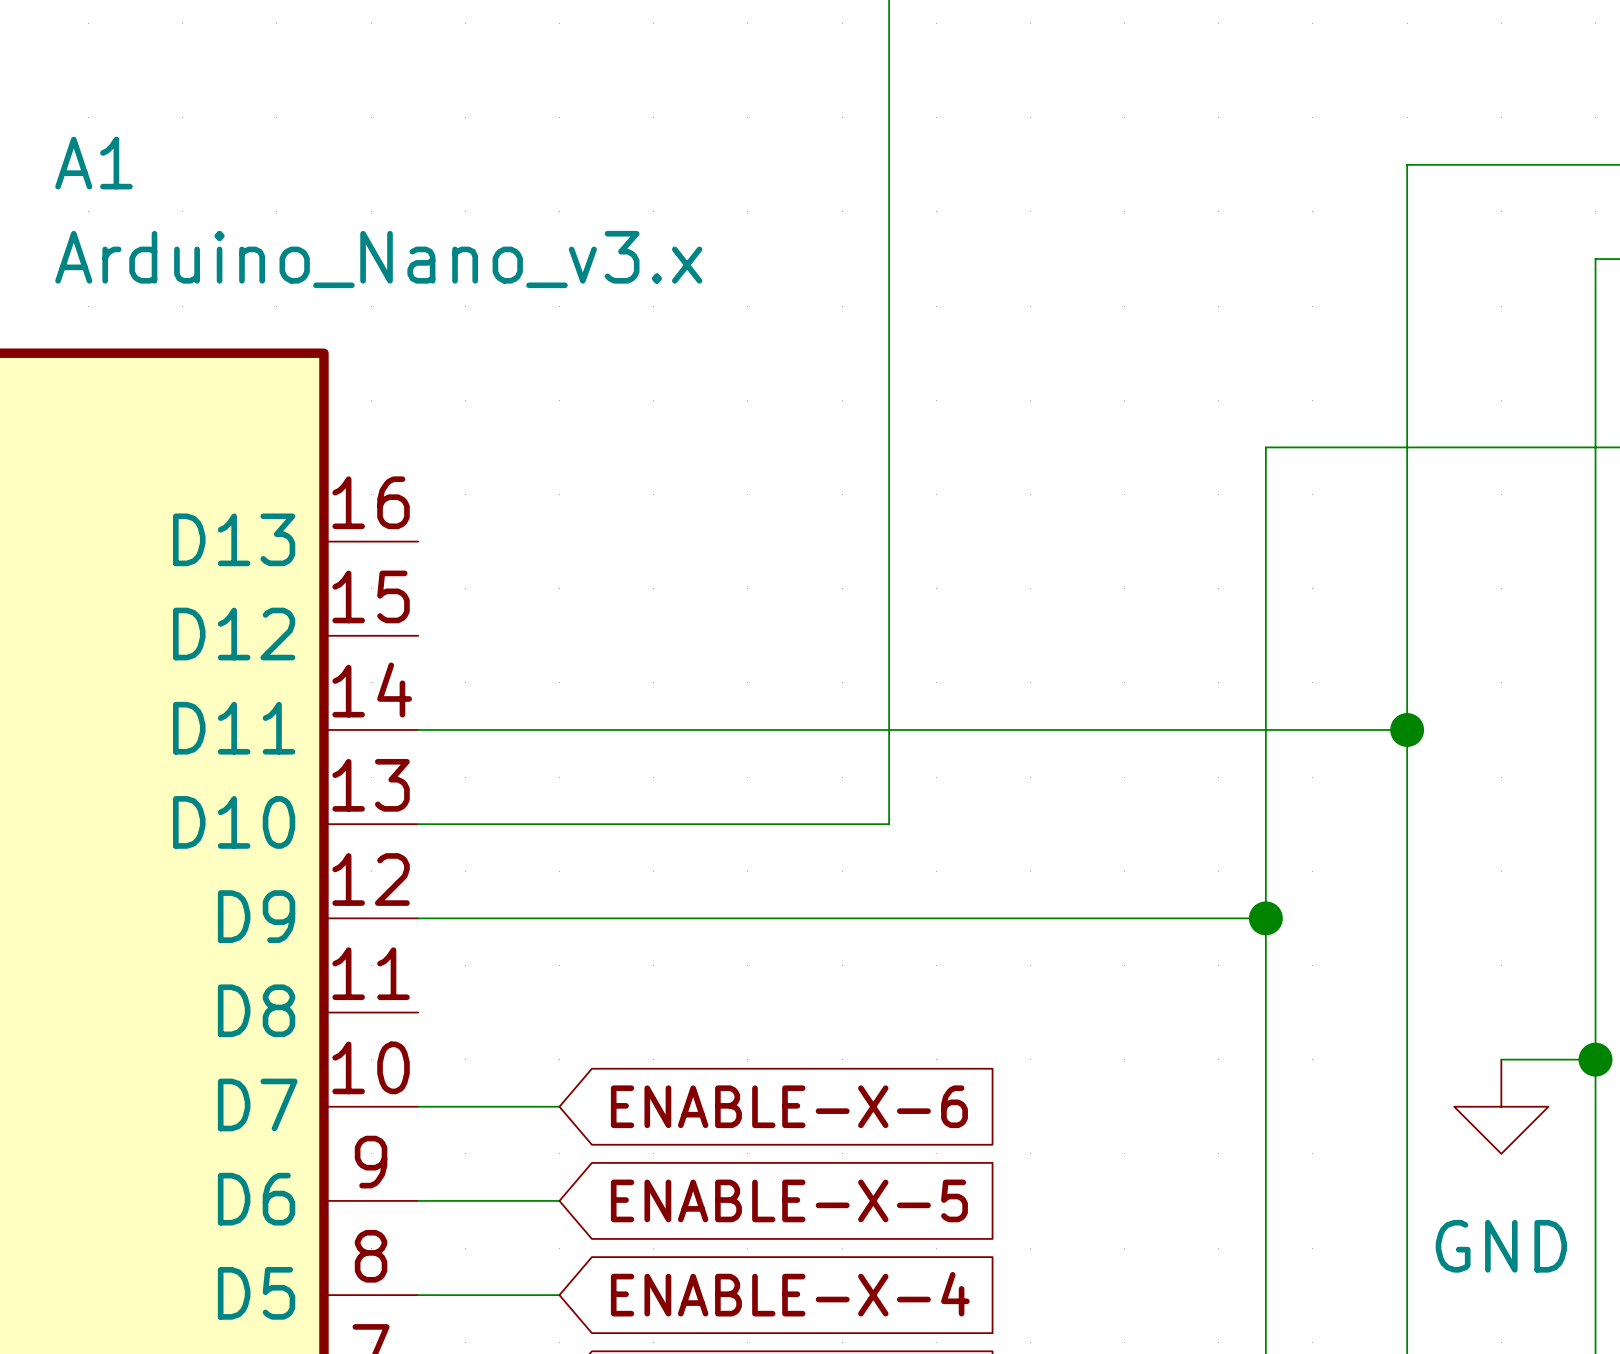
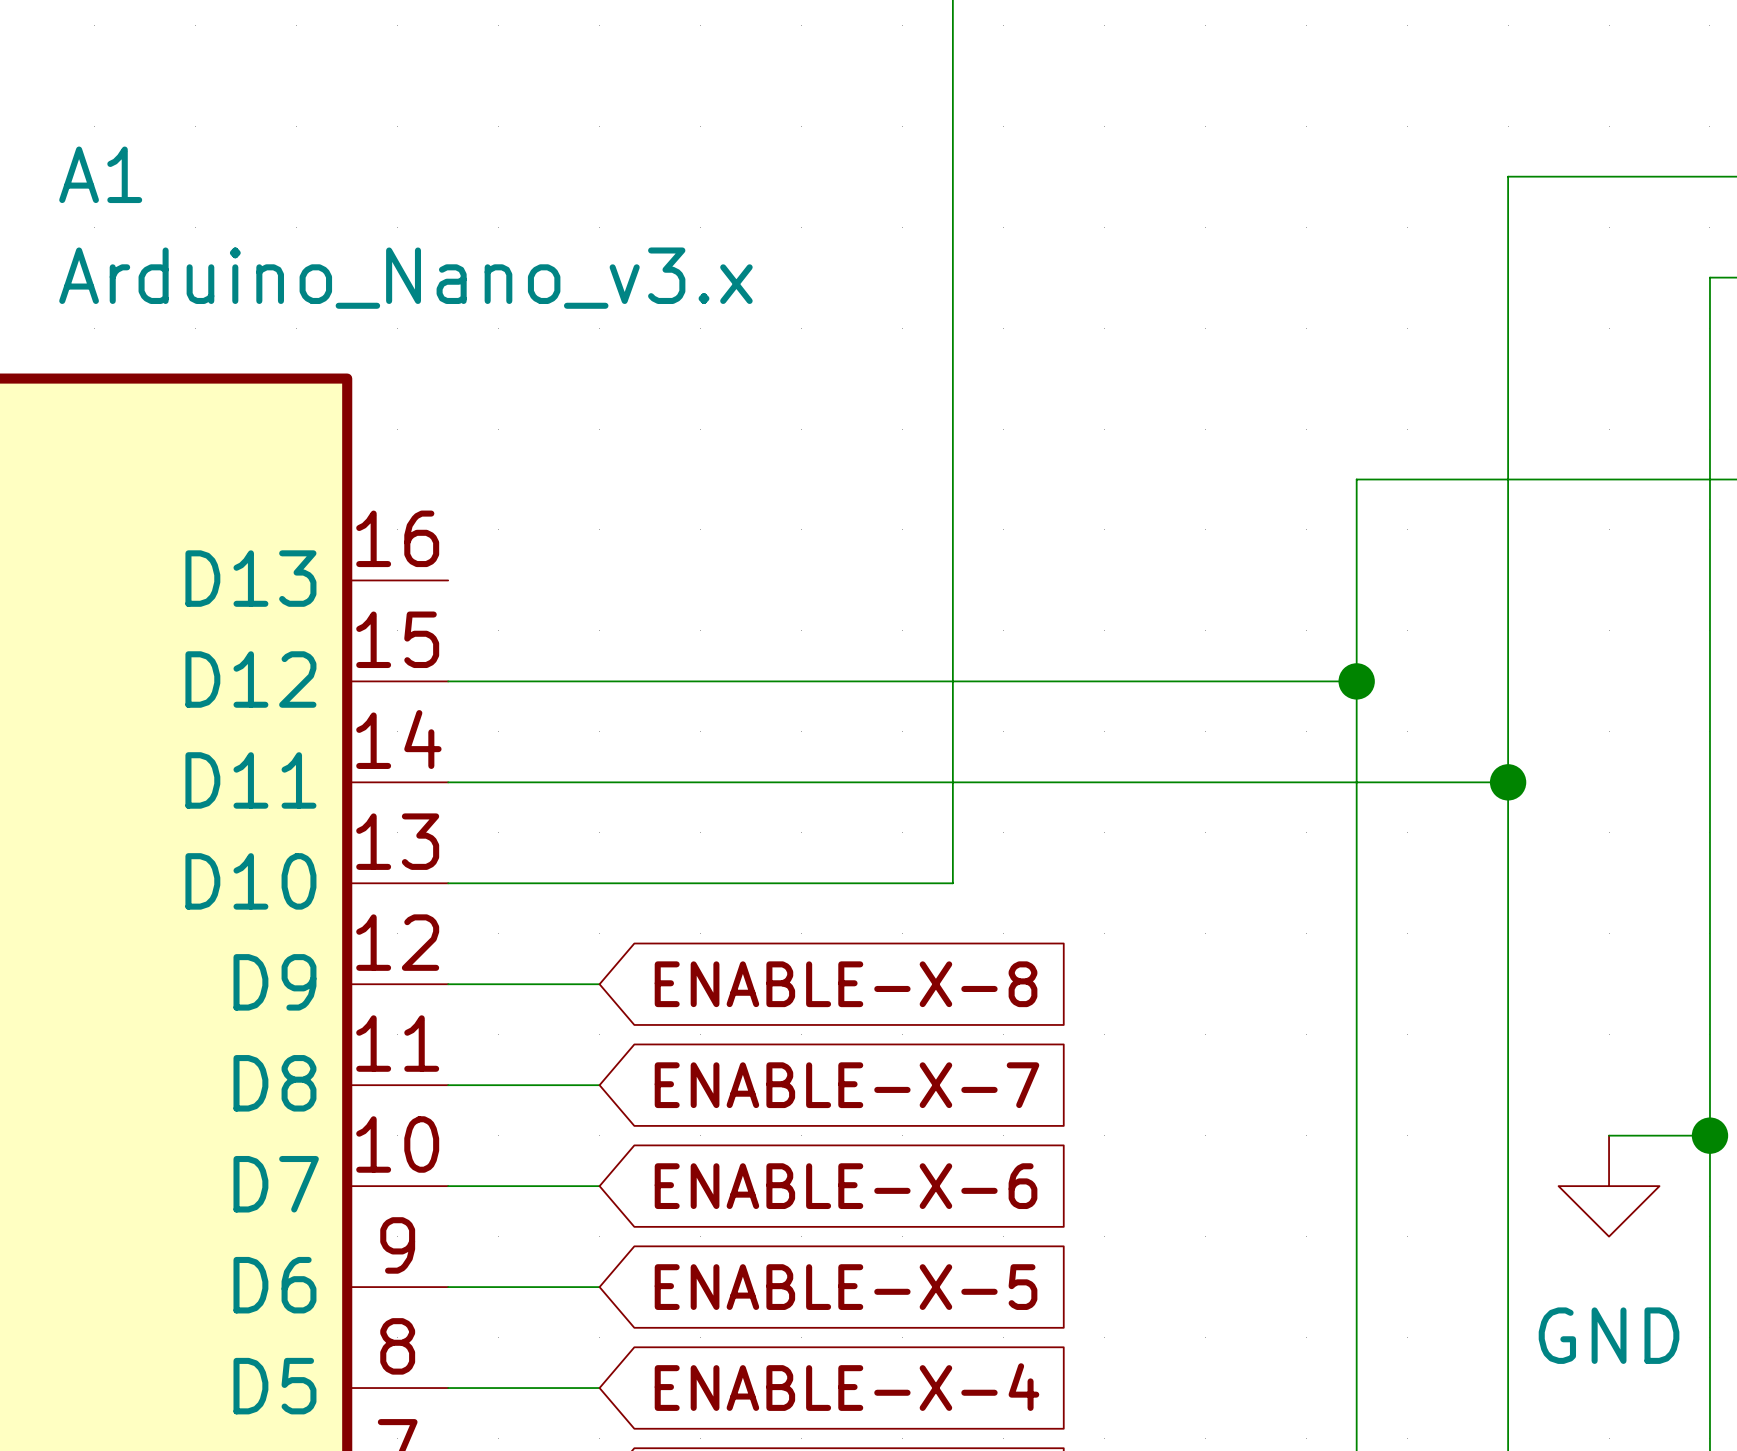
wire: none -> (448, 681) (1356, 681)
junction: none -> (1356, 681)
wire: (559, 918) (1265, 918) -> none
global label: none -> ENABLE-X-8 (846, 984)
junction: (1265, 918) -> none
wire: none -> (448, 1085) (599, 1085)
global label: none -> ENABLE-X-7 (846, 1085)

